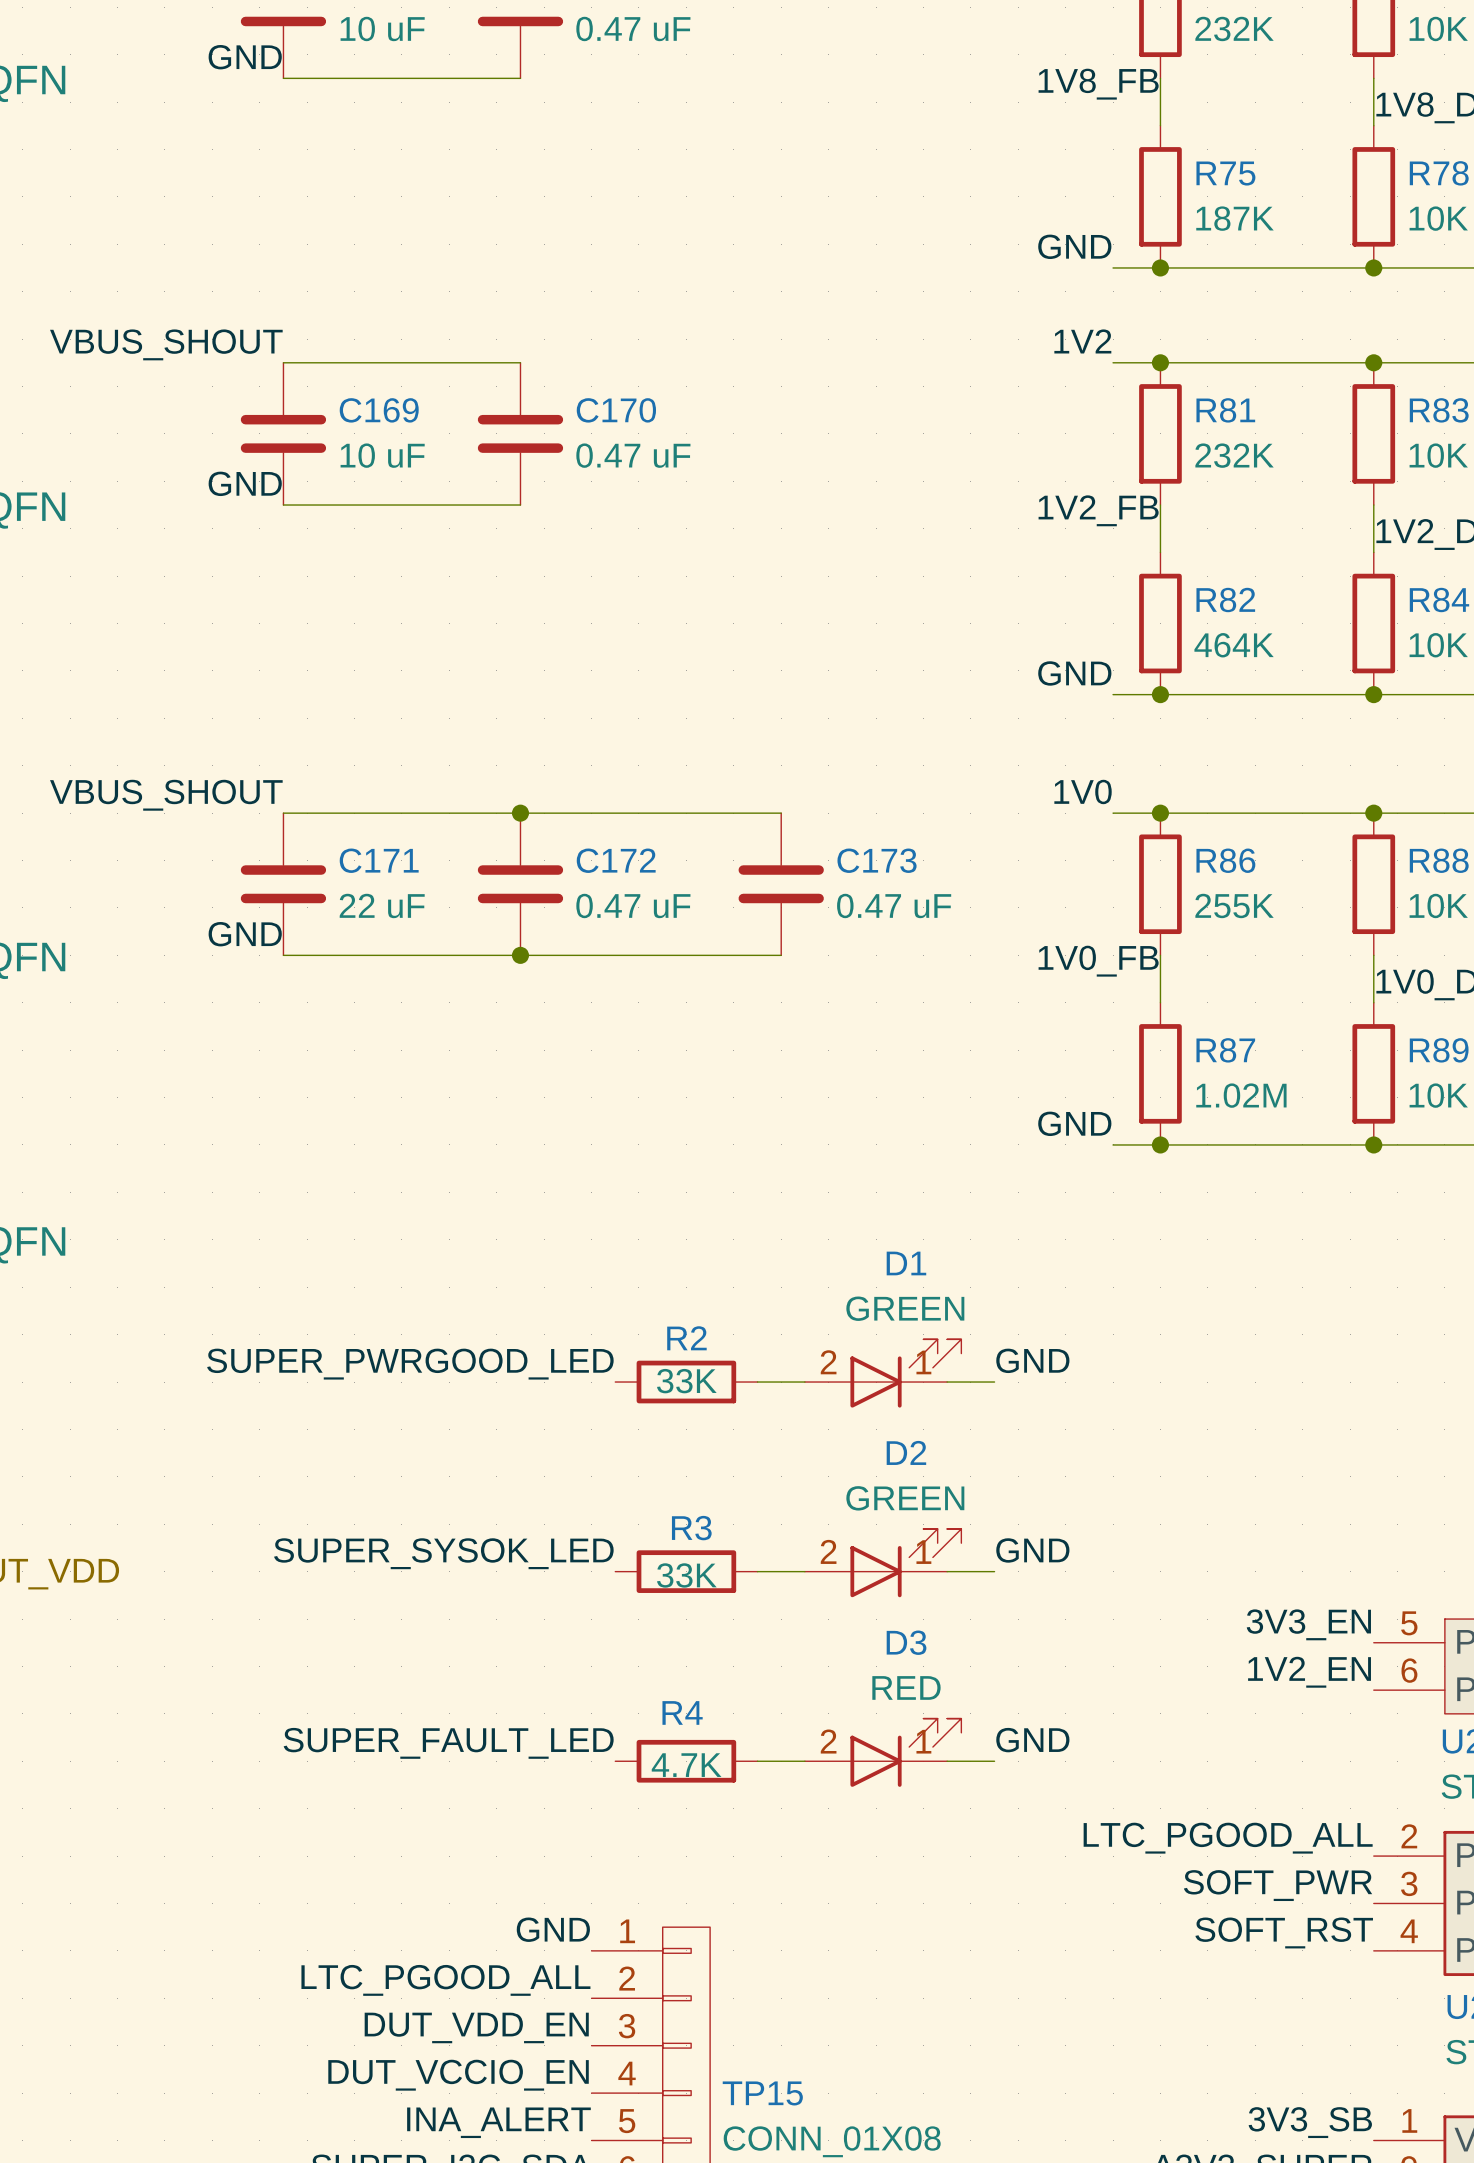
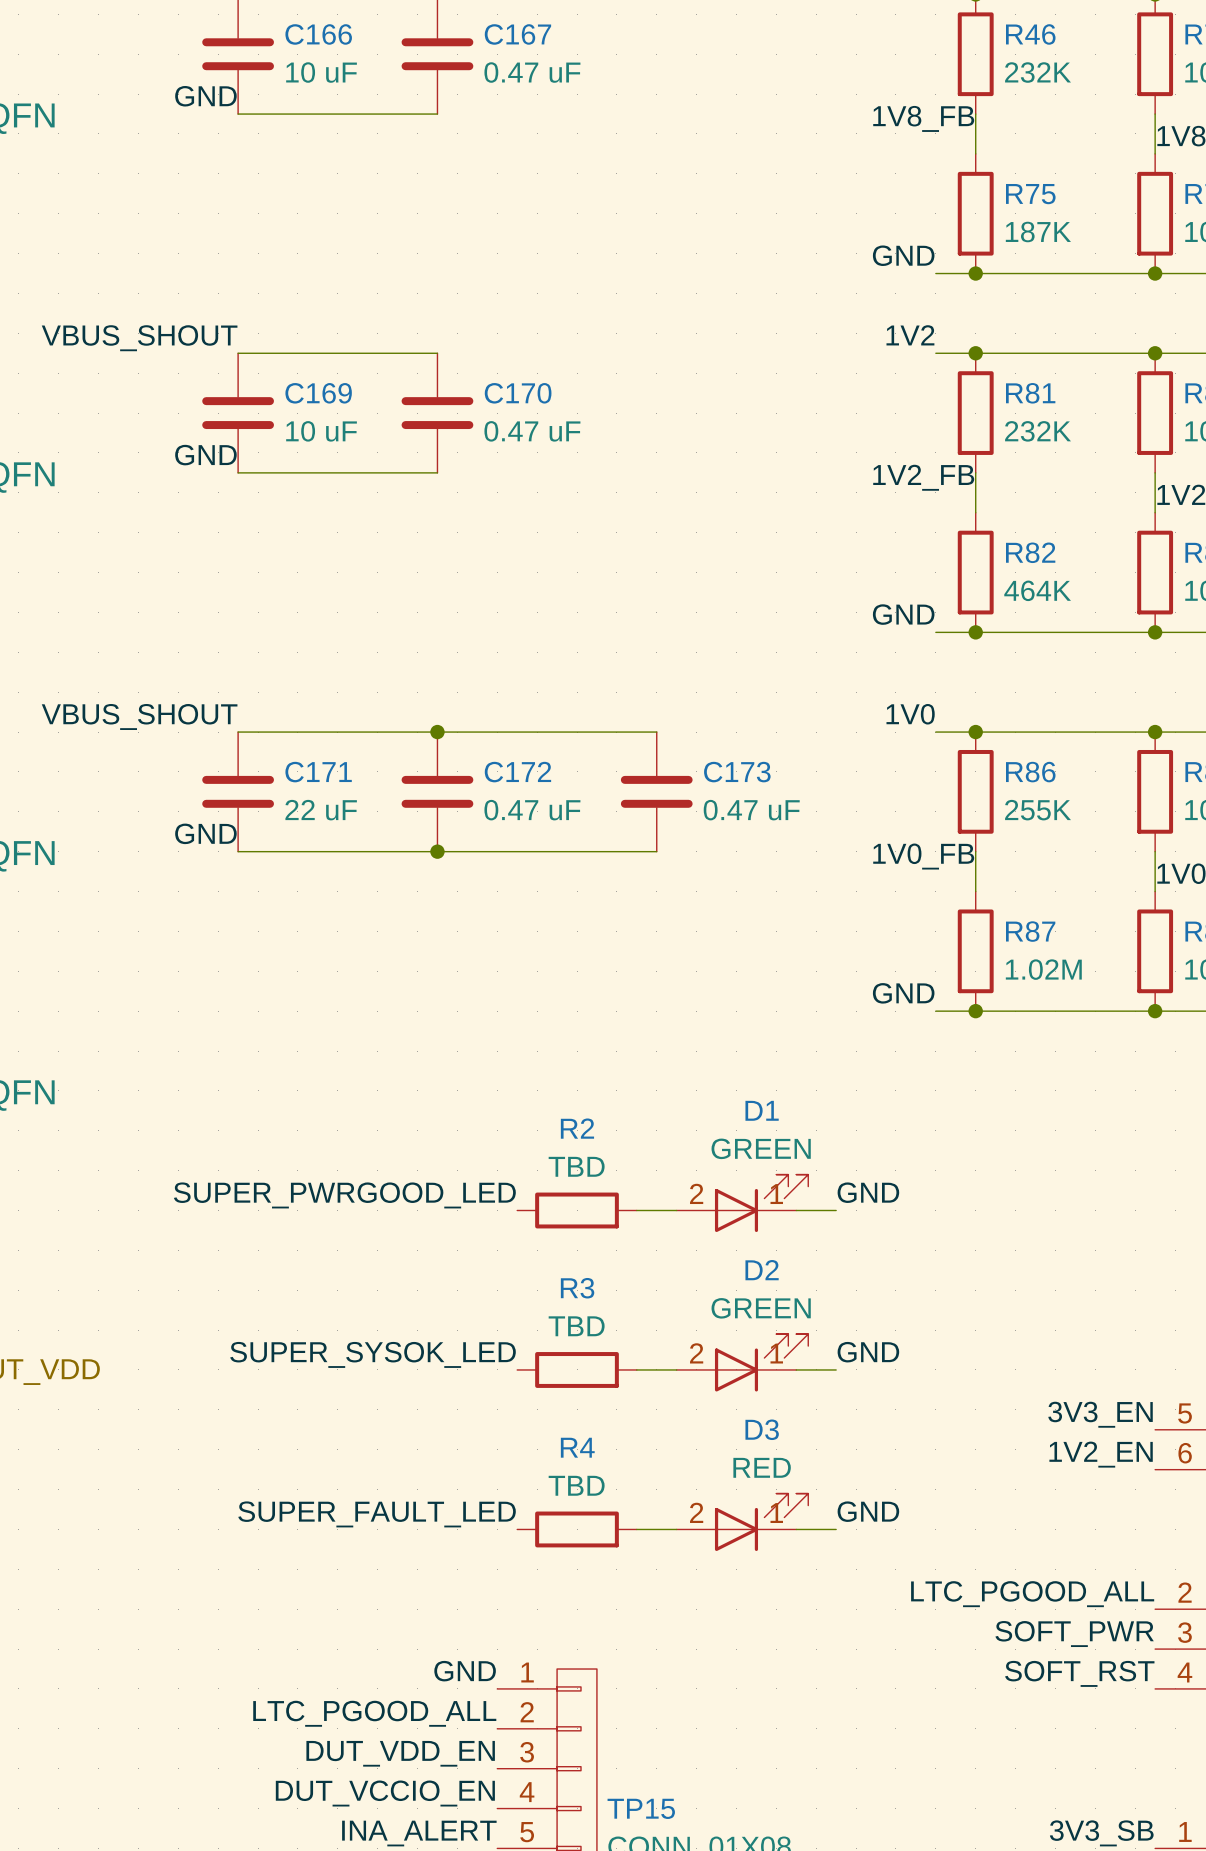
R2 name position: R2 (686, 1338) -> R2 (577, 1128)
R2 value: 33K (686, 1381) -> TBD (576, 1166)
R3 name position: R3 (691, 1528) -> R3 (577, 1288)
R3 value: 33K (686, 1575) -> TBD (576, 1326)
R4 name position: R4 (682, 1712) -> R4 (577, 1447)
R4 value: 4.7K (686, 1765) -> TBD (576, 1485)

